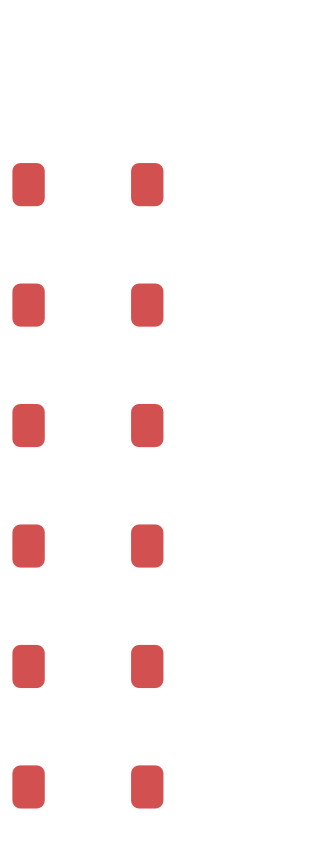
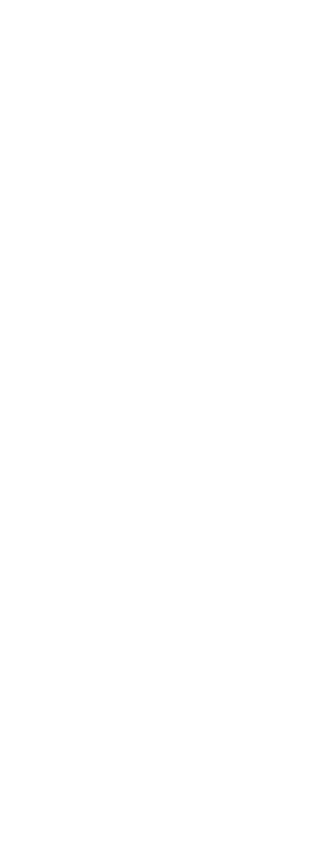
part: (87, 184) -> none
part: (87, 305) -> none
part: (87, 425) -> none
part: (87, 546) -> none
part: (87, 666) -> none
part: (87, 786) -> none

